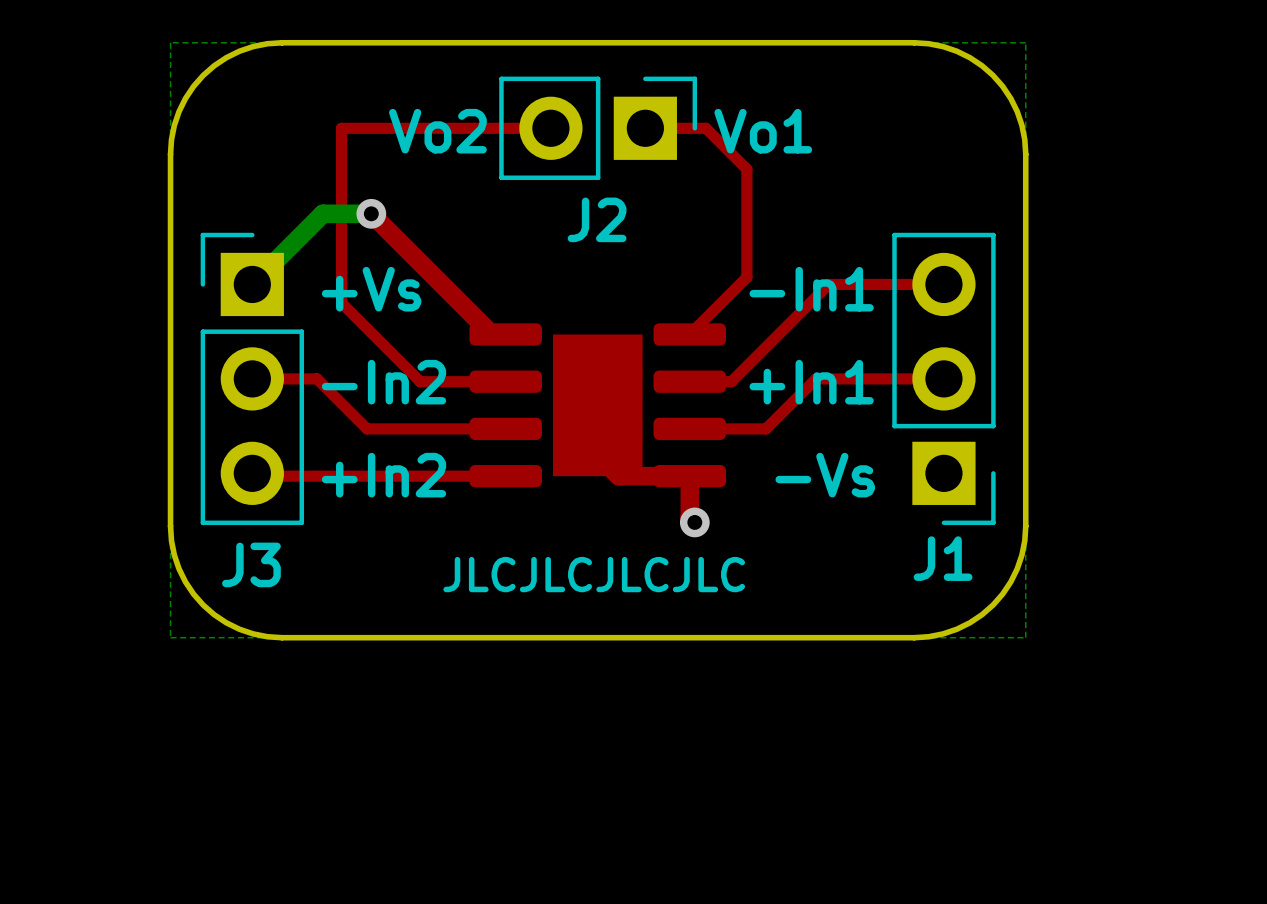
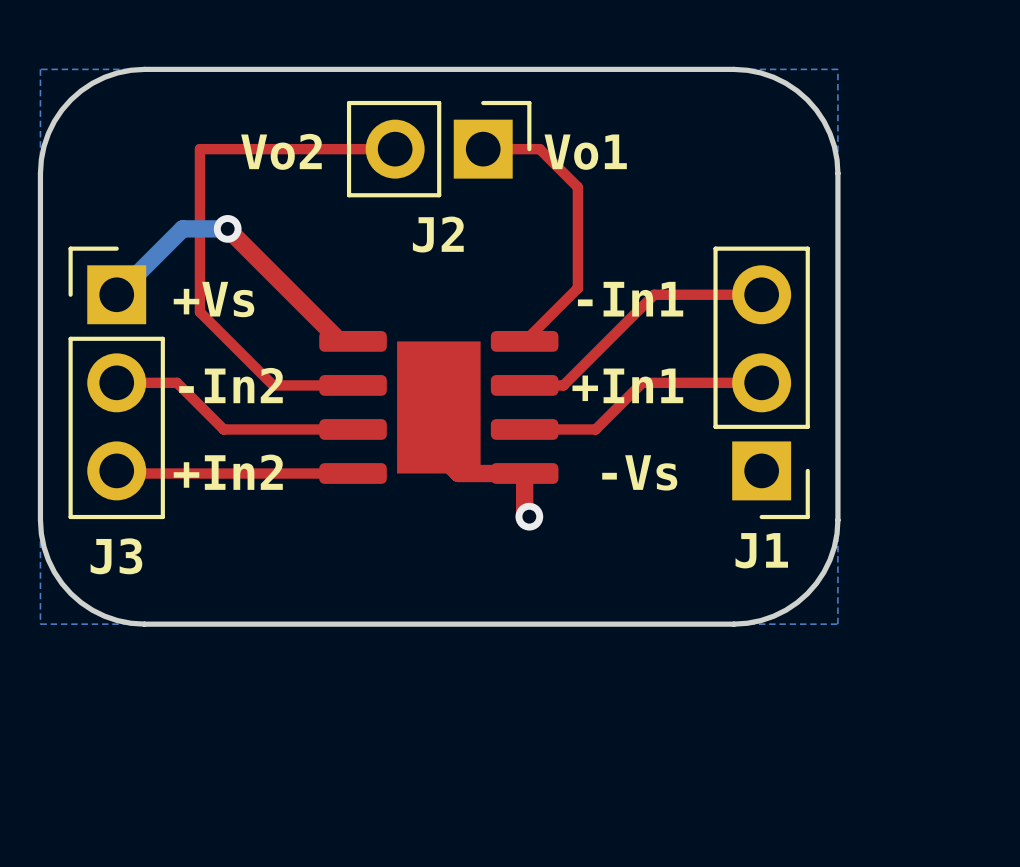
text: JLCJLCJLCJLC (594, 574) -> none

